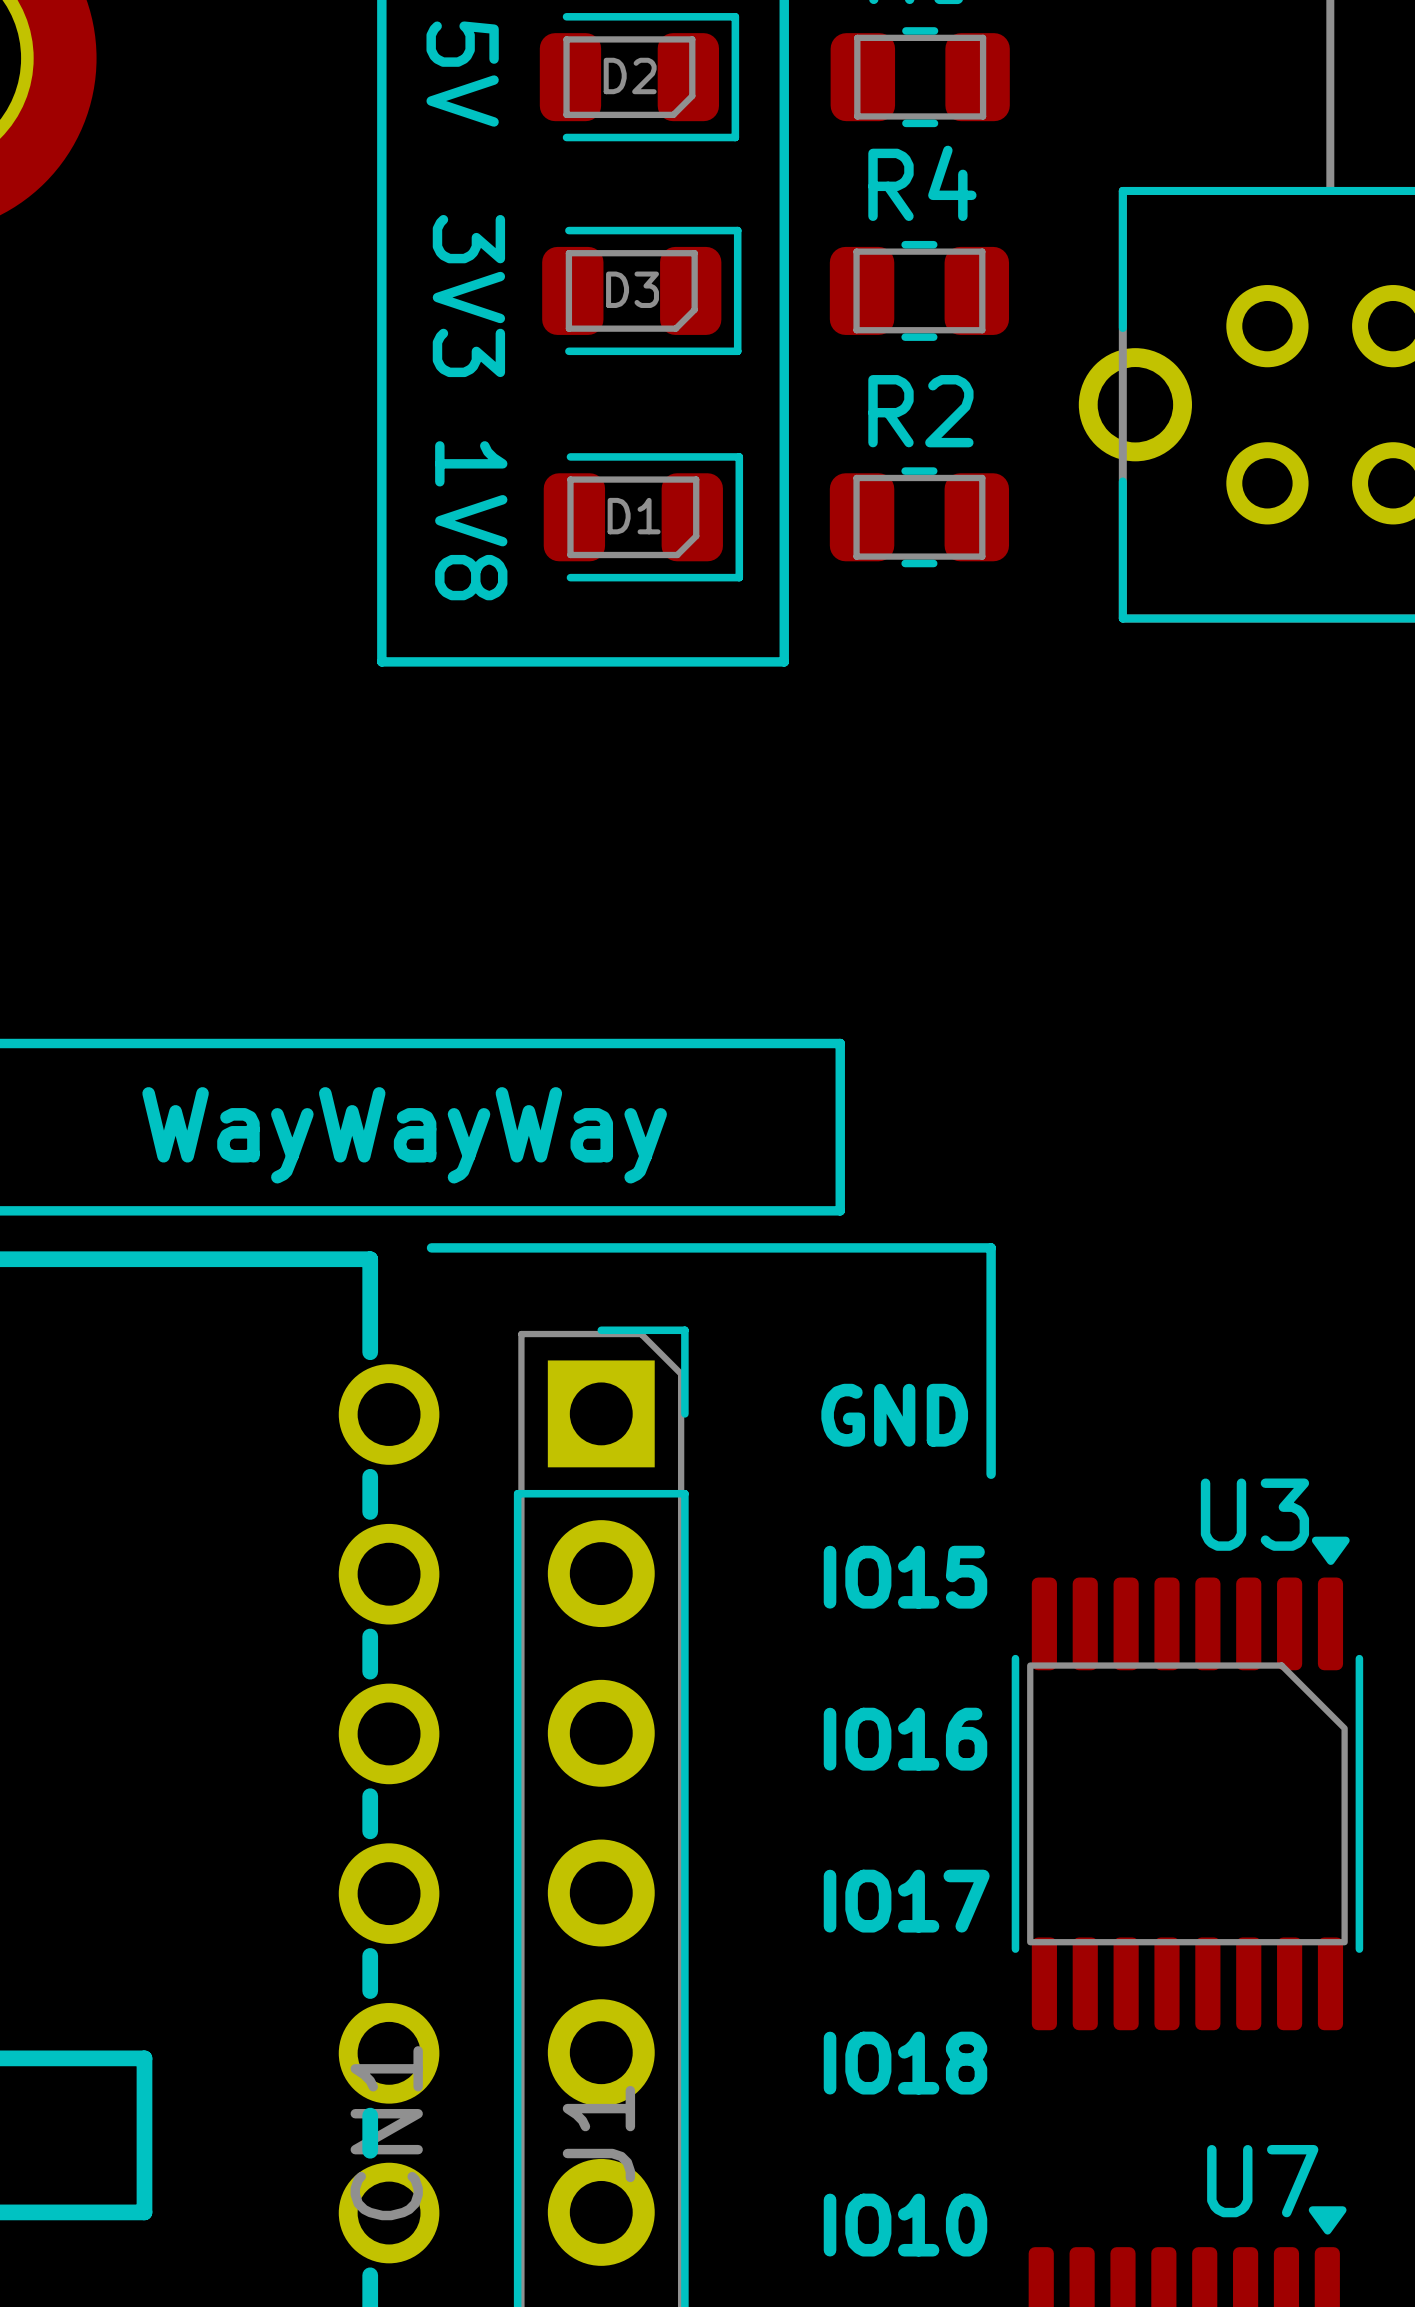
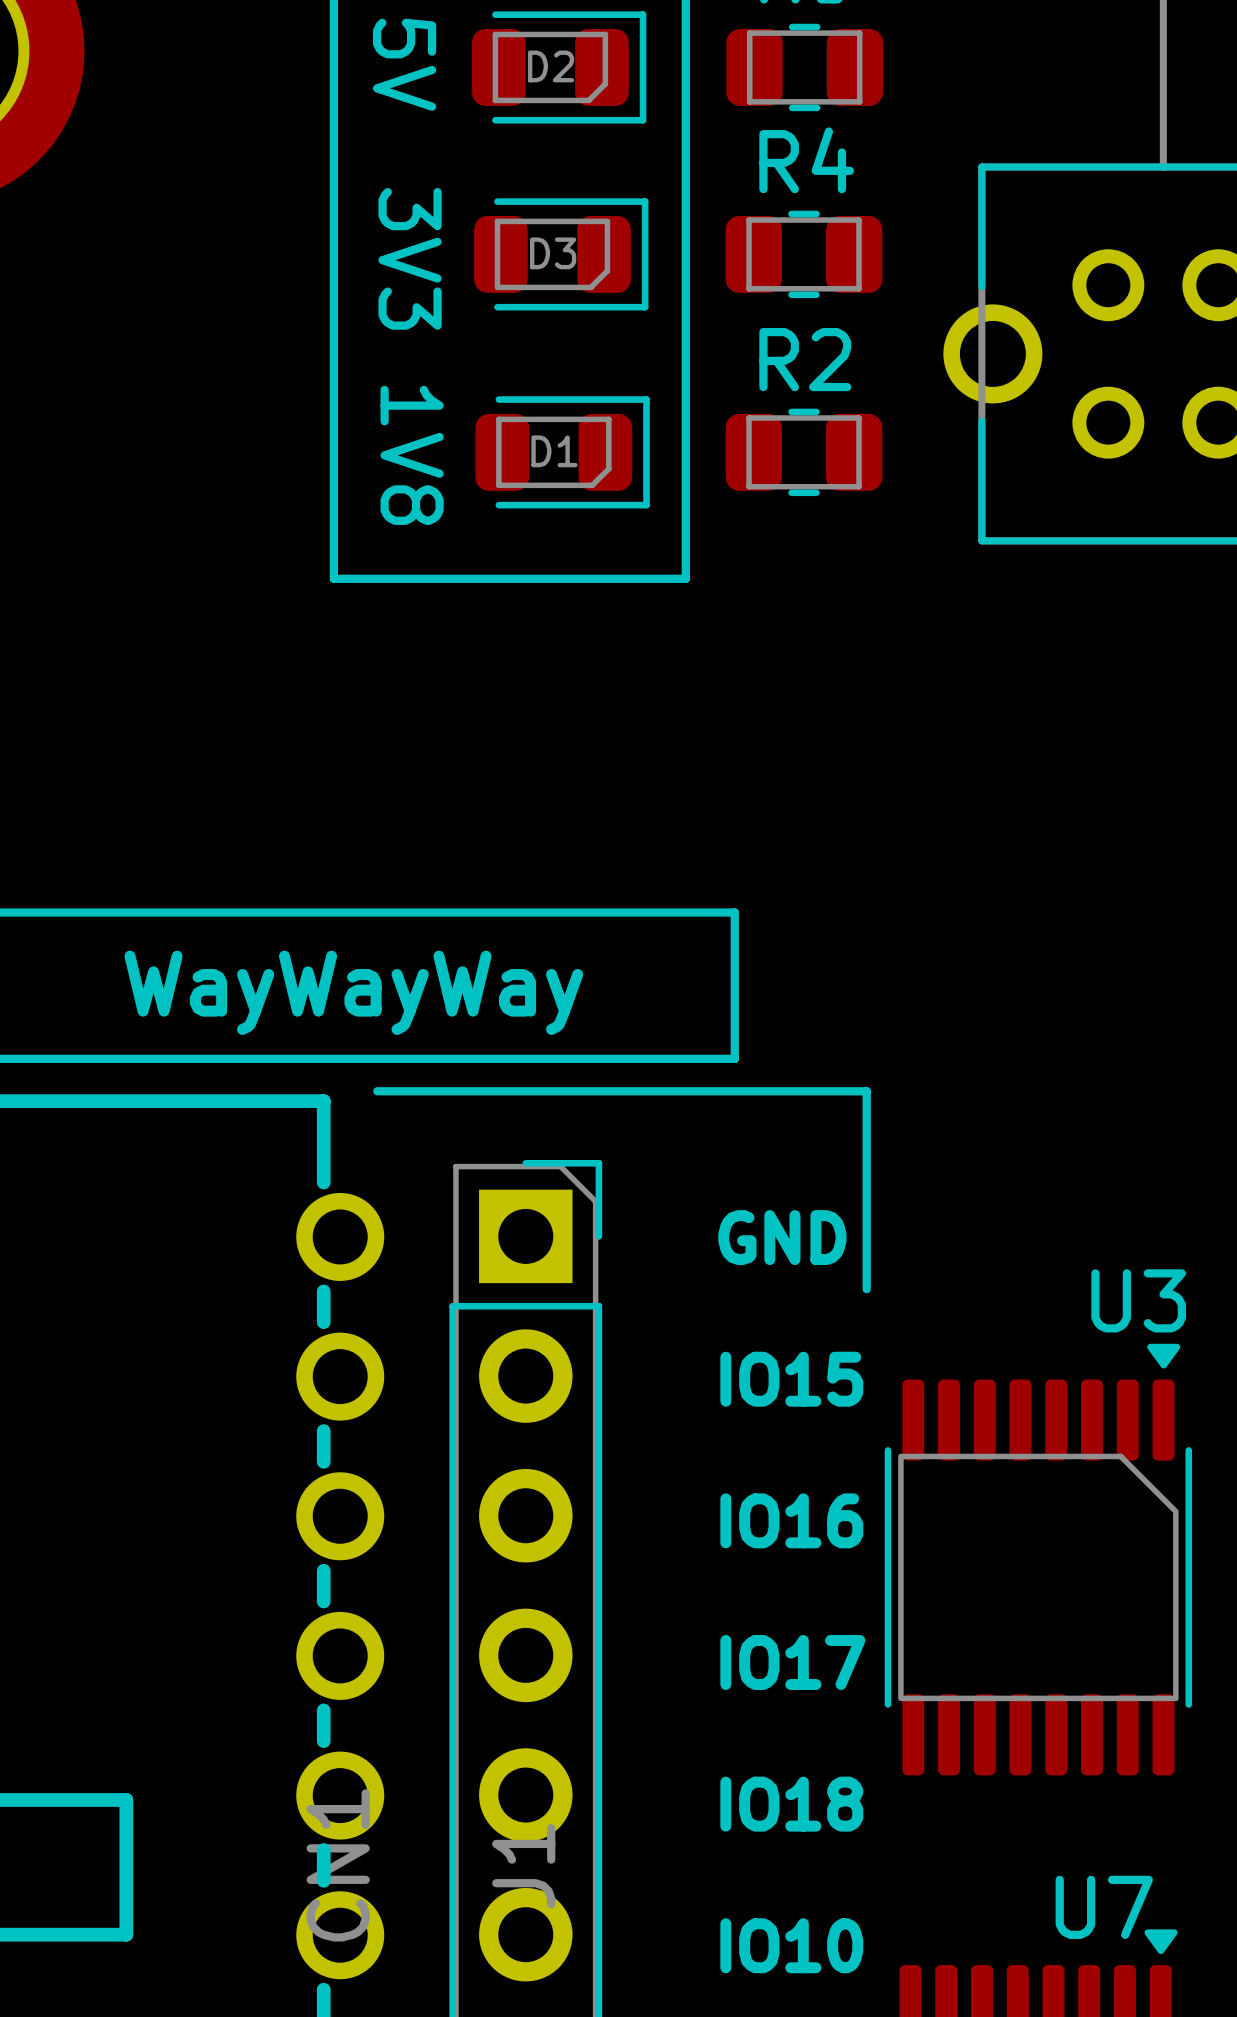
U3 name position: U3 (1254, 1514) -> U3 (1138, 1300)

